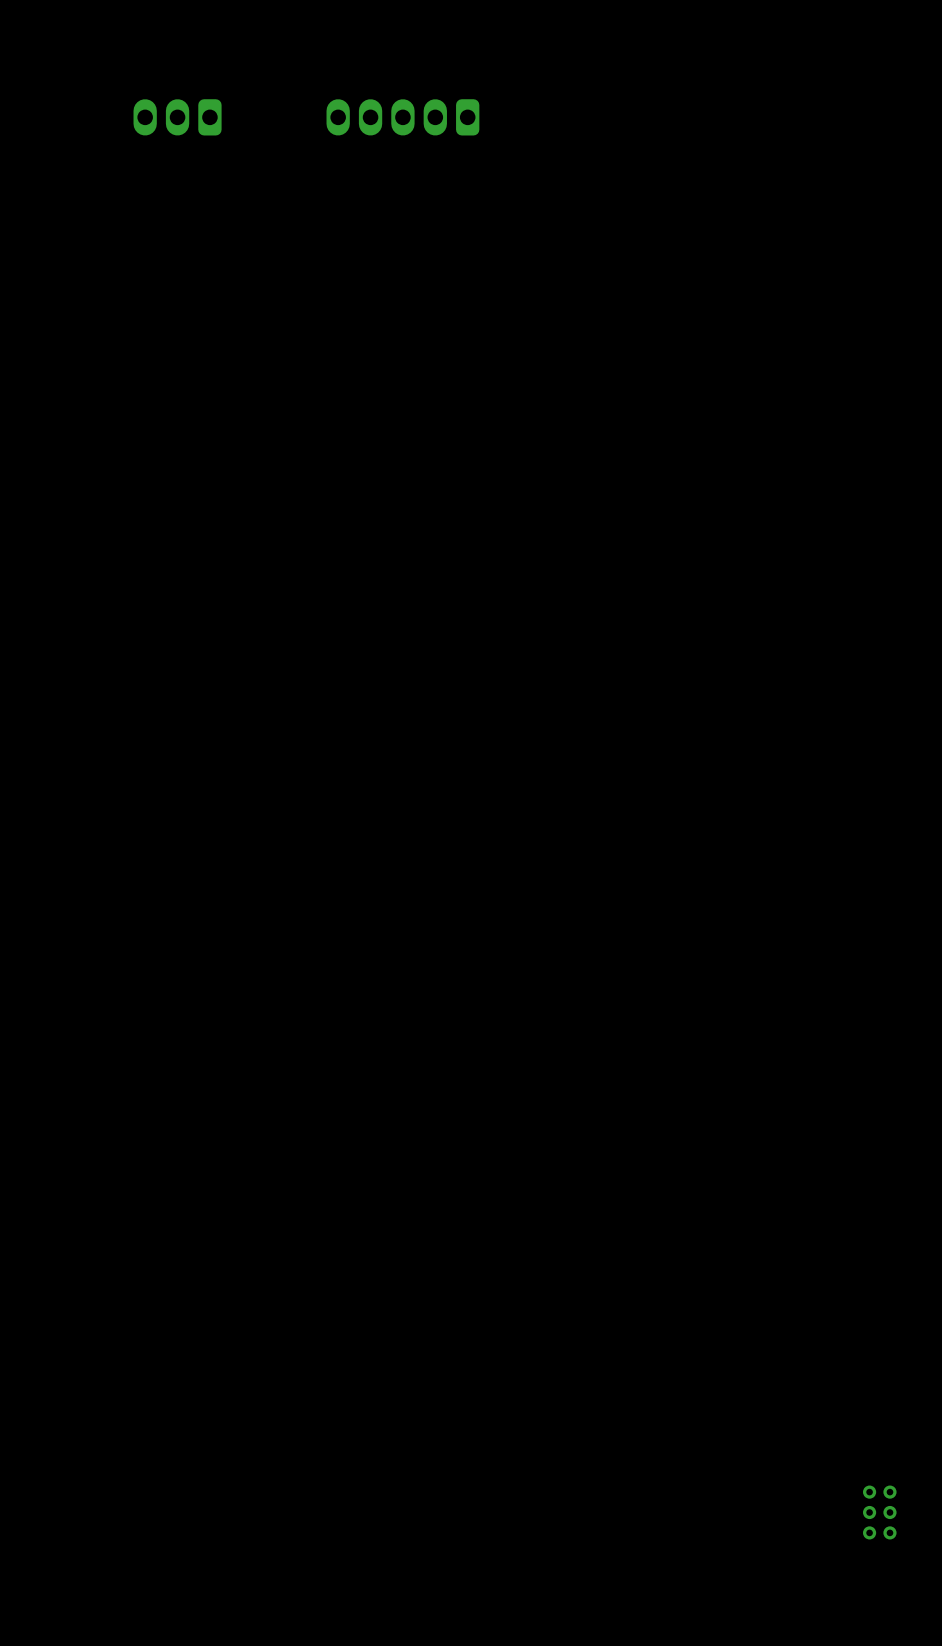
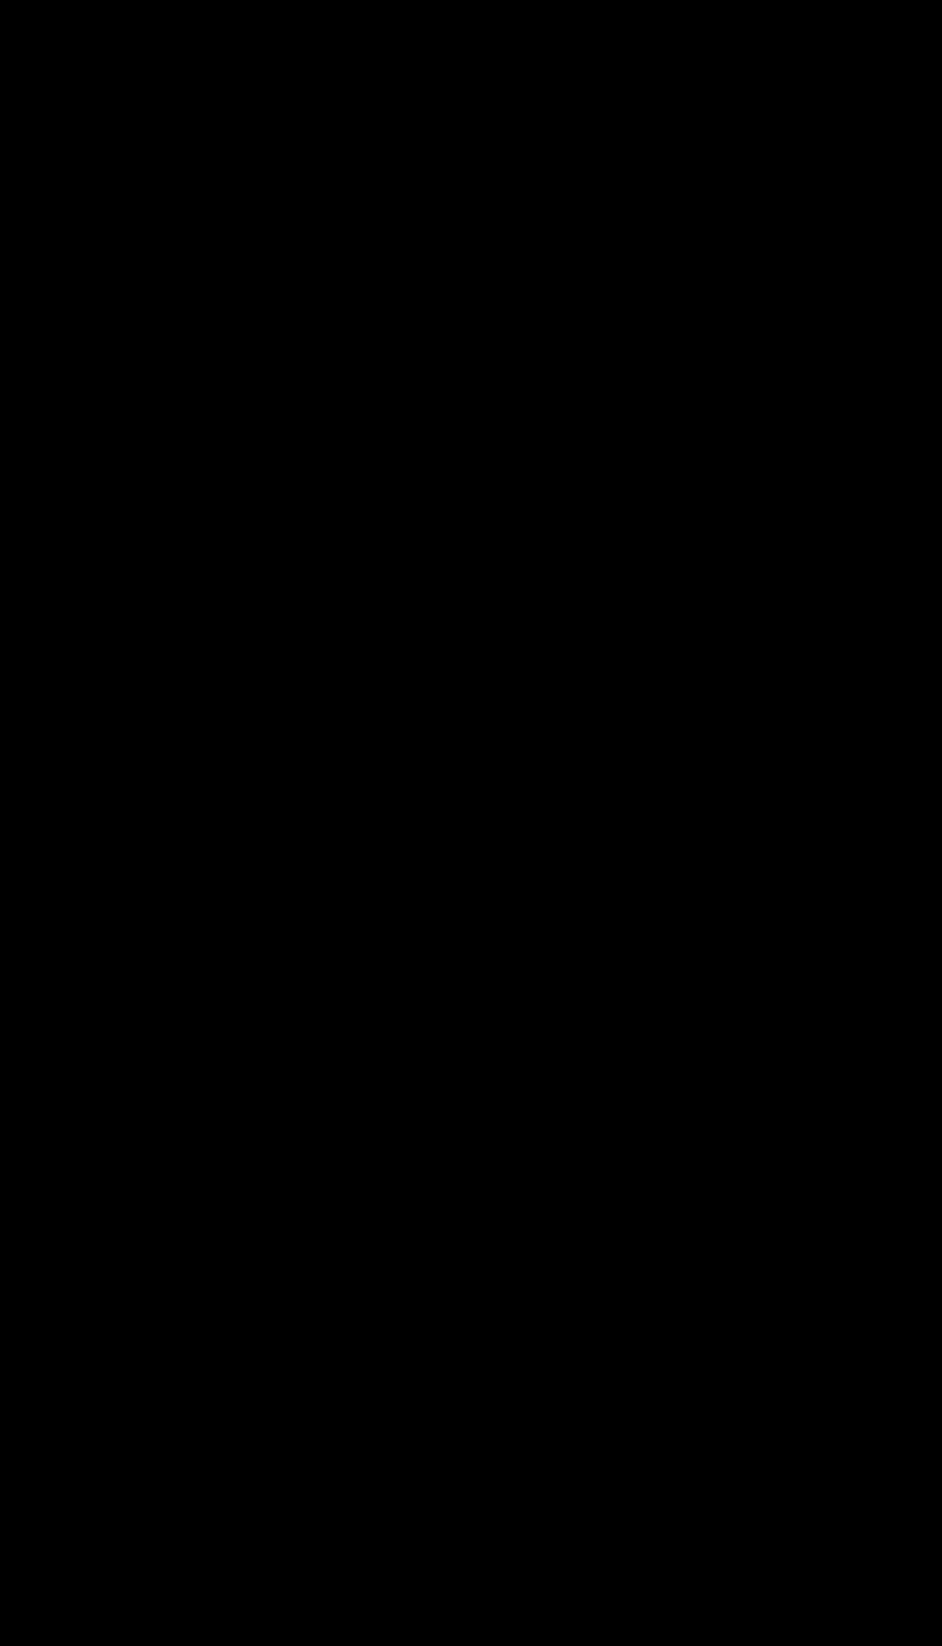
part: (177, 117) -> none
part: (402, 117) -> none
part: (879, 1512) -> none

